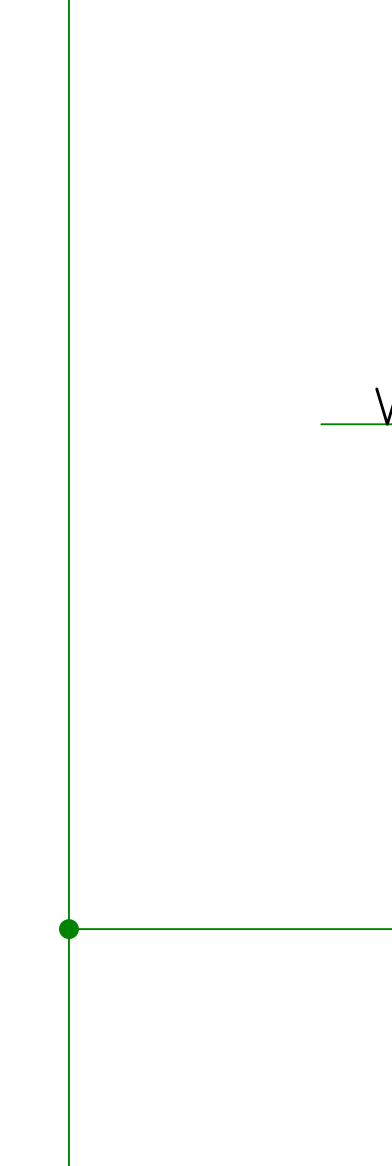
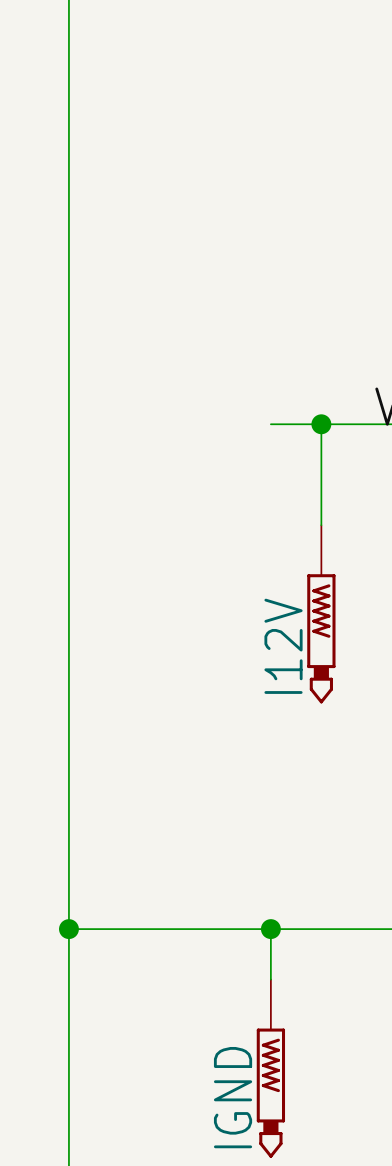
wire: none -> (270, 424) (321, 424) (321, 525)
junction: none -> (321, 424)
I12V: none -> (321, 614)
wire: none -> (270, 929) (270, 979)
junction: none -> (270, 929)
IGND: none -> (270, 1068)

